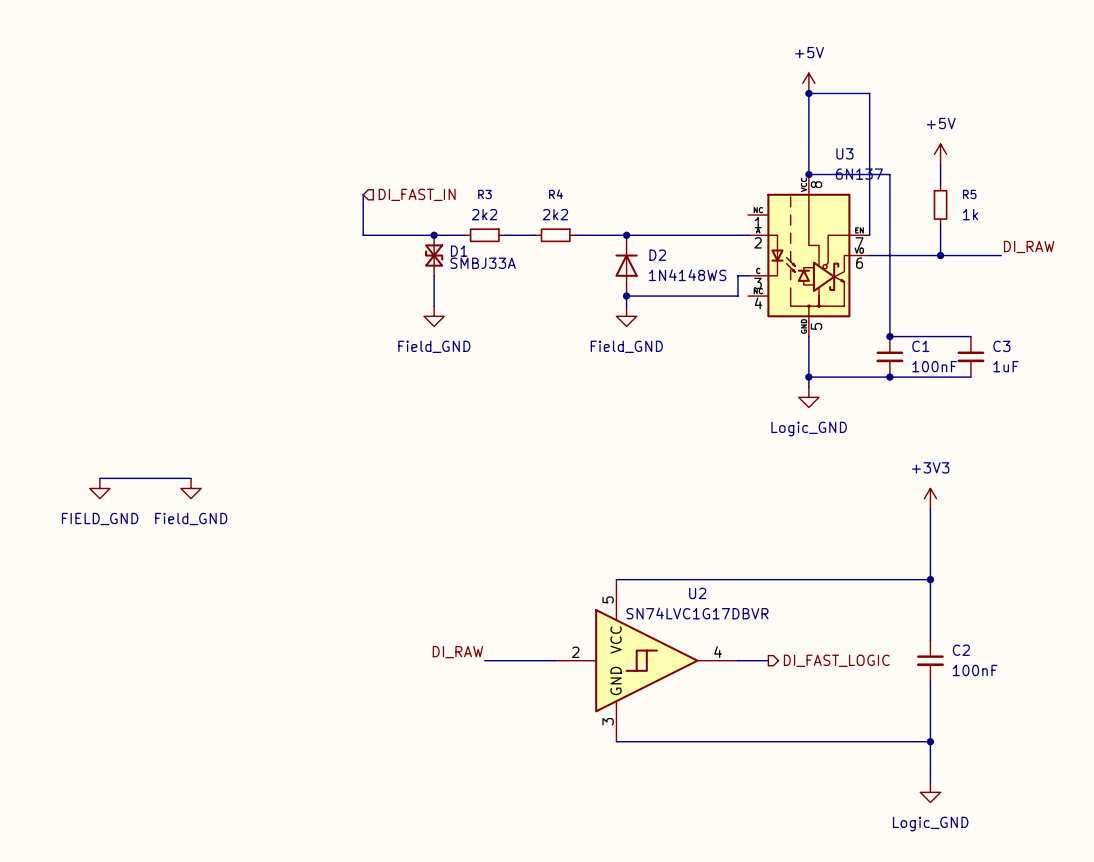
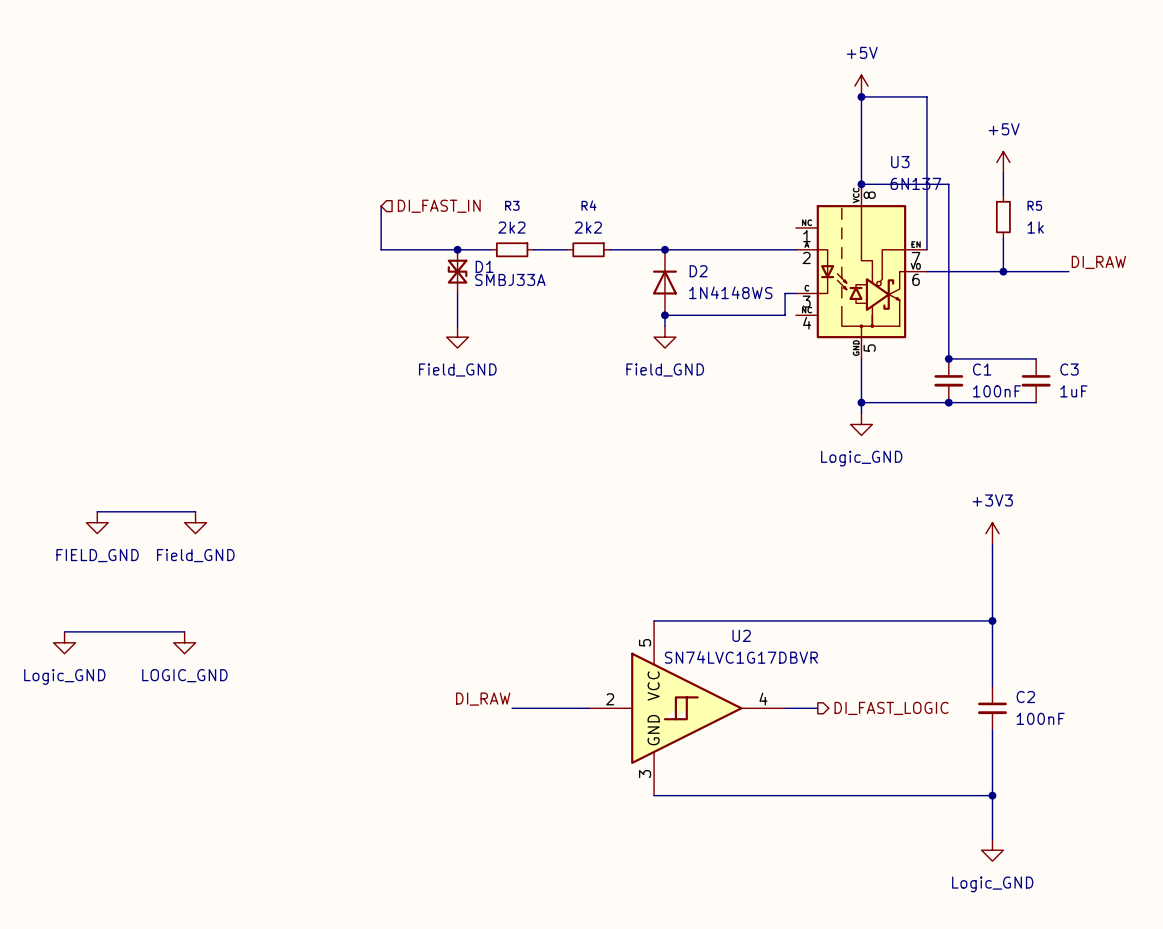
wire: none -> (64, 631) (184, 631)
power symbol: none -> Logic_GND (64, 642)
power symbol: none -> LOGIC_GND (184, 642)

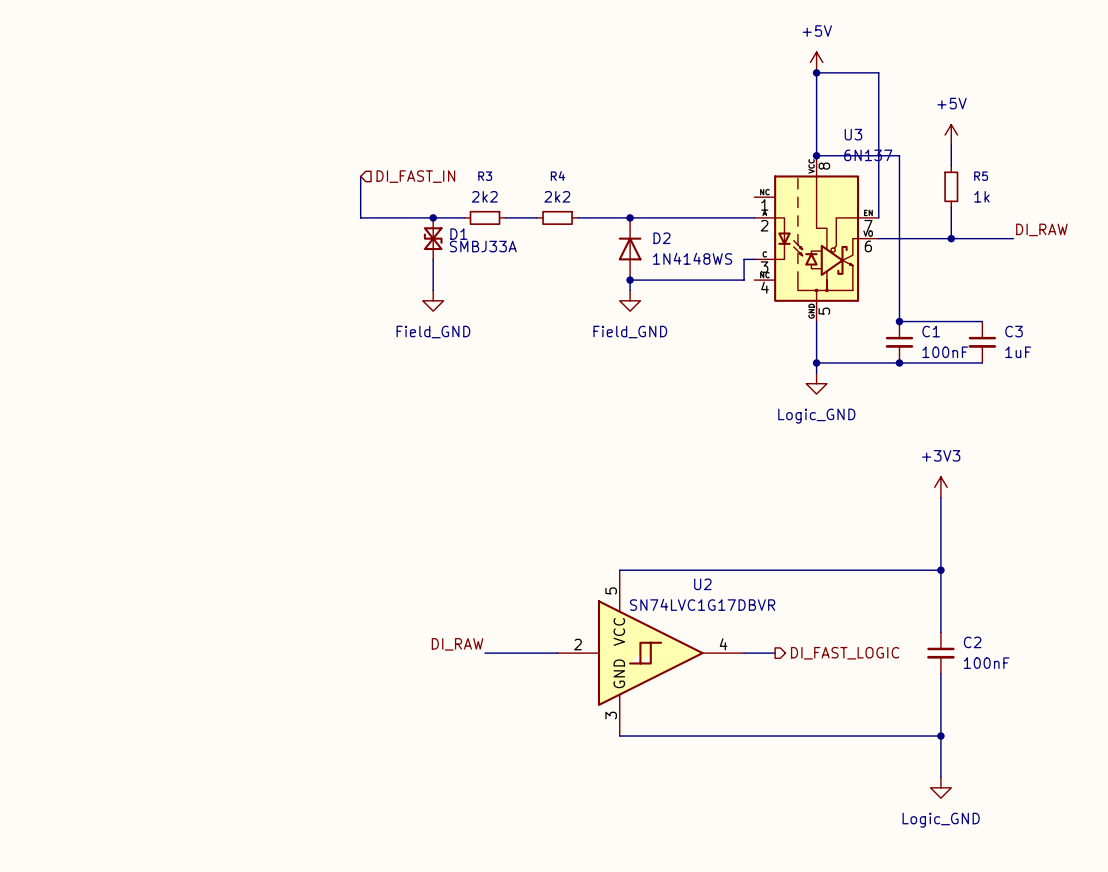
wire: (97, 511) (195, 511) -> none
power symbol: FIELD_GND (97, 522) -> none
power symbol: Field_GND (195, 522) -> none
wire: (64, 631) (184, 631) -> none
power symbol: Logic_GND (64, 642) -> none
power symbol: LOGIC_GND (184, 642) -> none

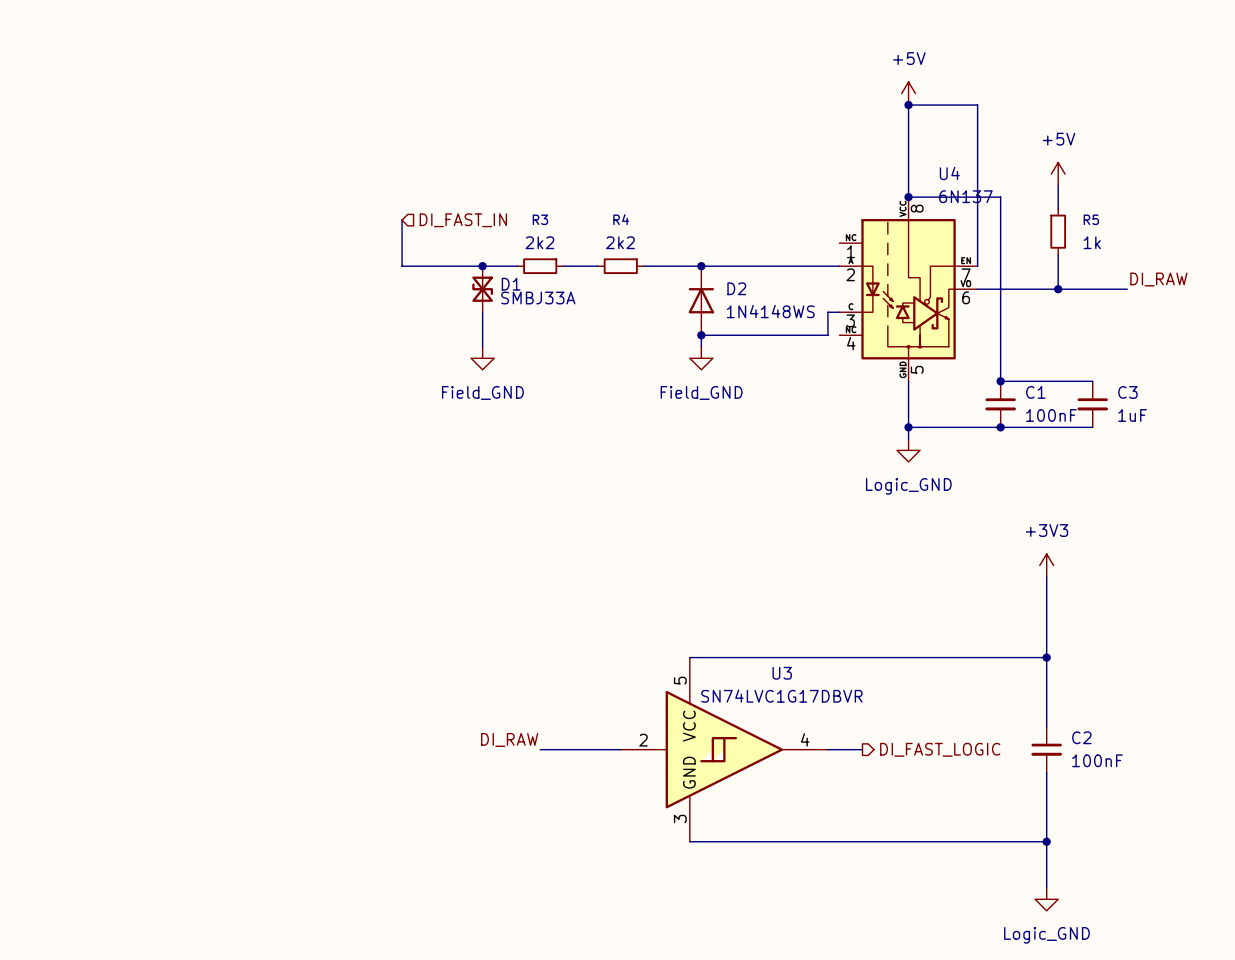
U3 name: U3 (853, 134) -> U4 (949, 173)
U2 name: U2 (702, 584) -> U3 (782, 673)

